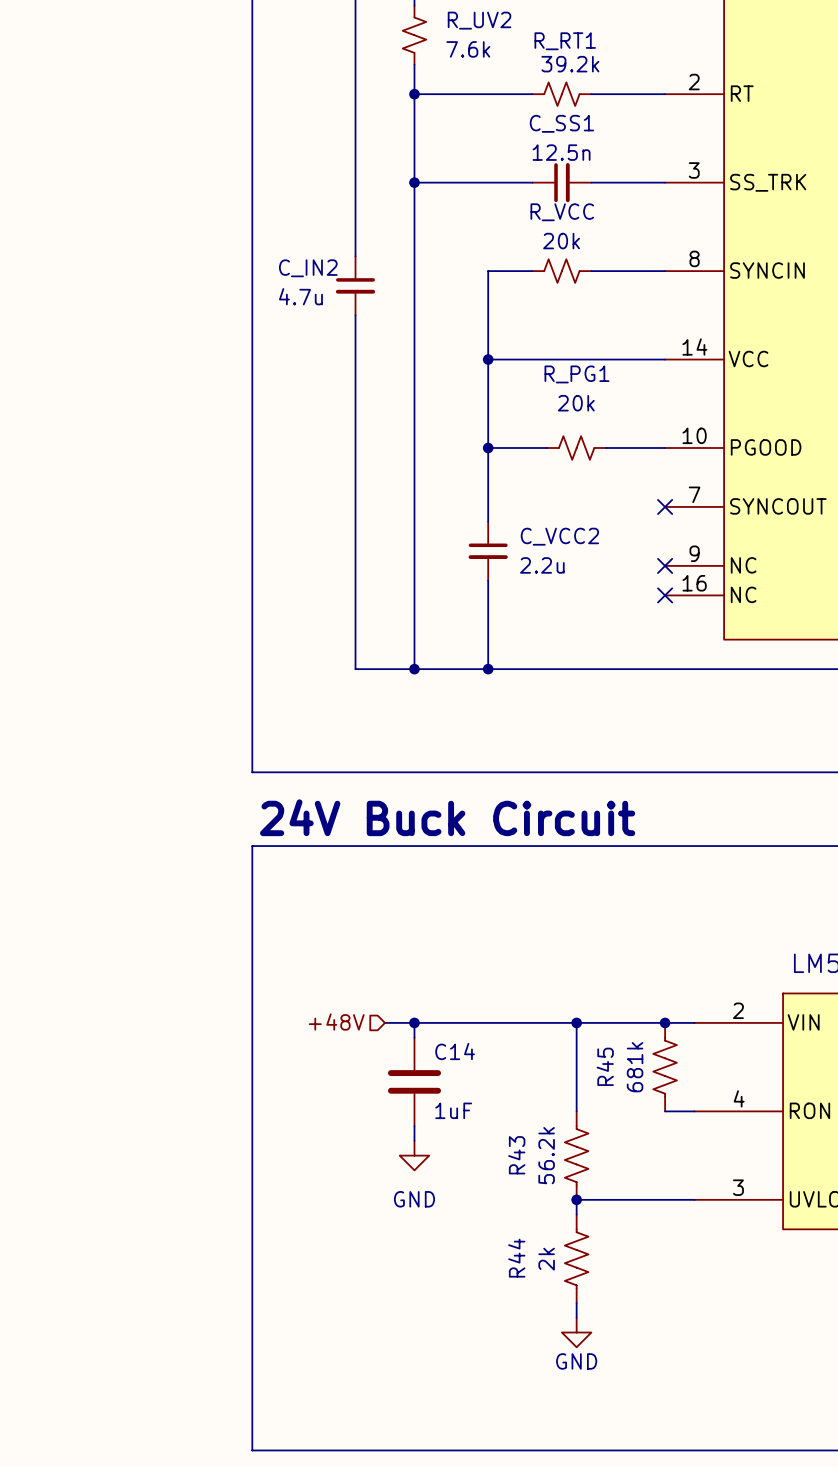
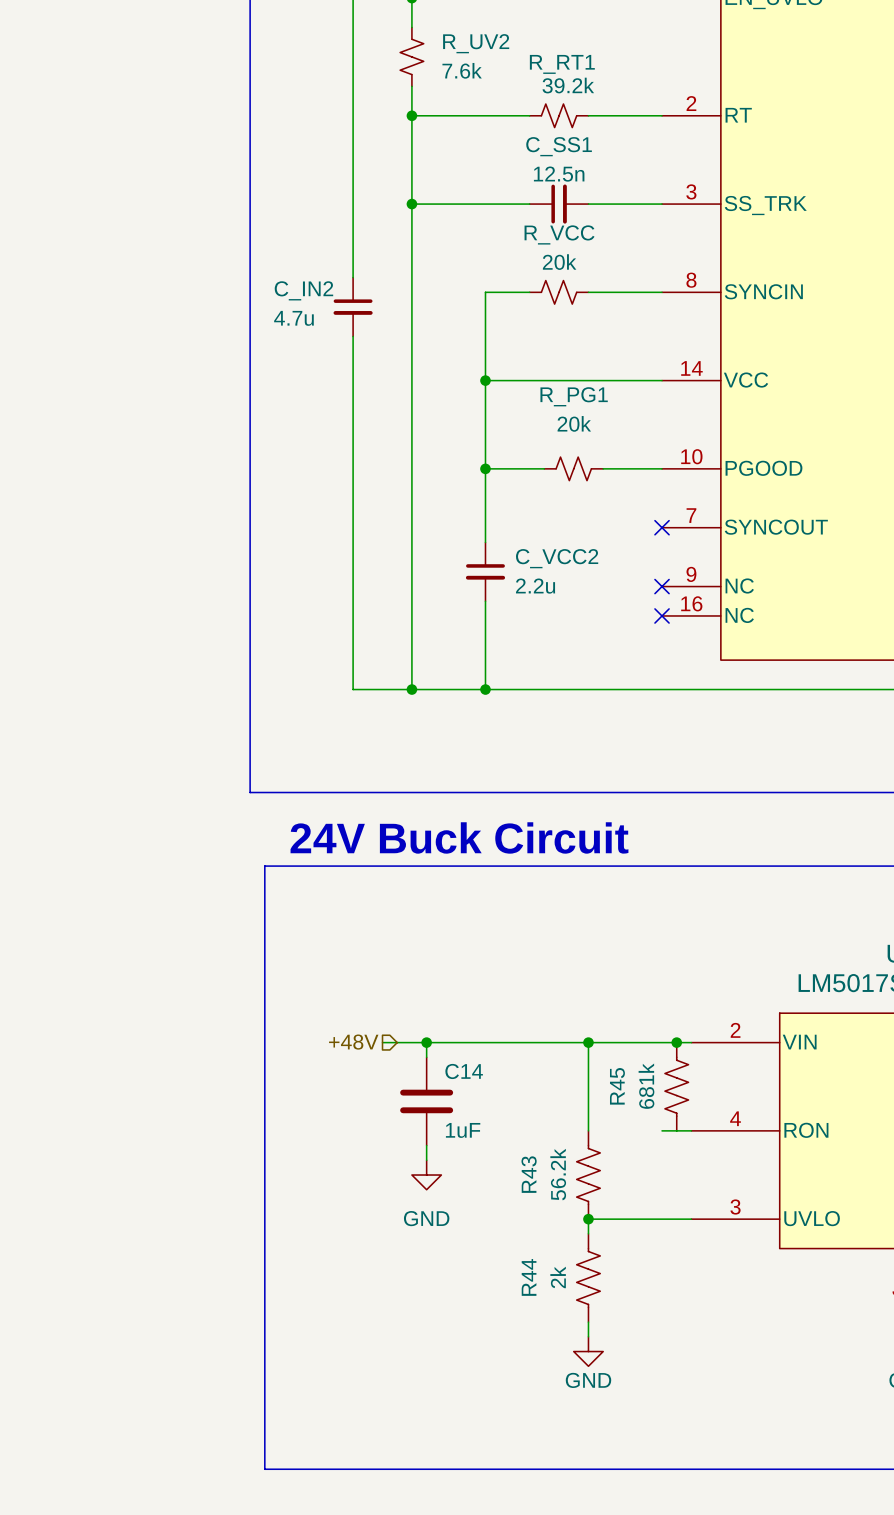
text position: 24V Buck Circuit (447, 817) -> 24V Buck Circuit (459, 837)
line: (267, 846) (252, 846) (252, 1450) (267, 1450) -> (264, 866) (264, 1469)
hierarchical label position: +48V (336, 1022) -> +48V (353, 1042)
wire: (414, 1022) (414, 1037) -> (426, 1042) (426, 1057)
junction position: (414, 1022) -> (426, 1042)
wire: (576, 1022) (576, 1111) -> (588, 1042) (588, 1130)
junction position: (576, 1022) -> (588, 1042)
junction position: (665, 1022) -> (676, 1042)
R45 position: (665, 1067) -> (676, 1086)
C14 position: (414, 1081) -> (426, 1101)
wire: (414, 1126) (414, 1140) -> (426, 1145) (426, 1160)
power symbol position: GND (414, 1155) -> GND (426, 1175)
R43 position: (576, 1155) -> (588, 1175)
junction position: (576, 1199) -> (588, 1219)
wire: (591, 1199) (576, 1199) (576, 1214) -> (588, 1219) (588, 1233)
R44 position: (576, 1258) -> (588, 1277)
wire: (576, 1303) (576, 1317) -> (588, 1322) (588, 1336)
power symbol position: GND (576, 1332) -> GND (588, 1351)

